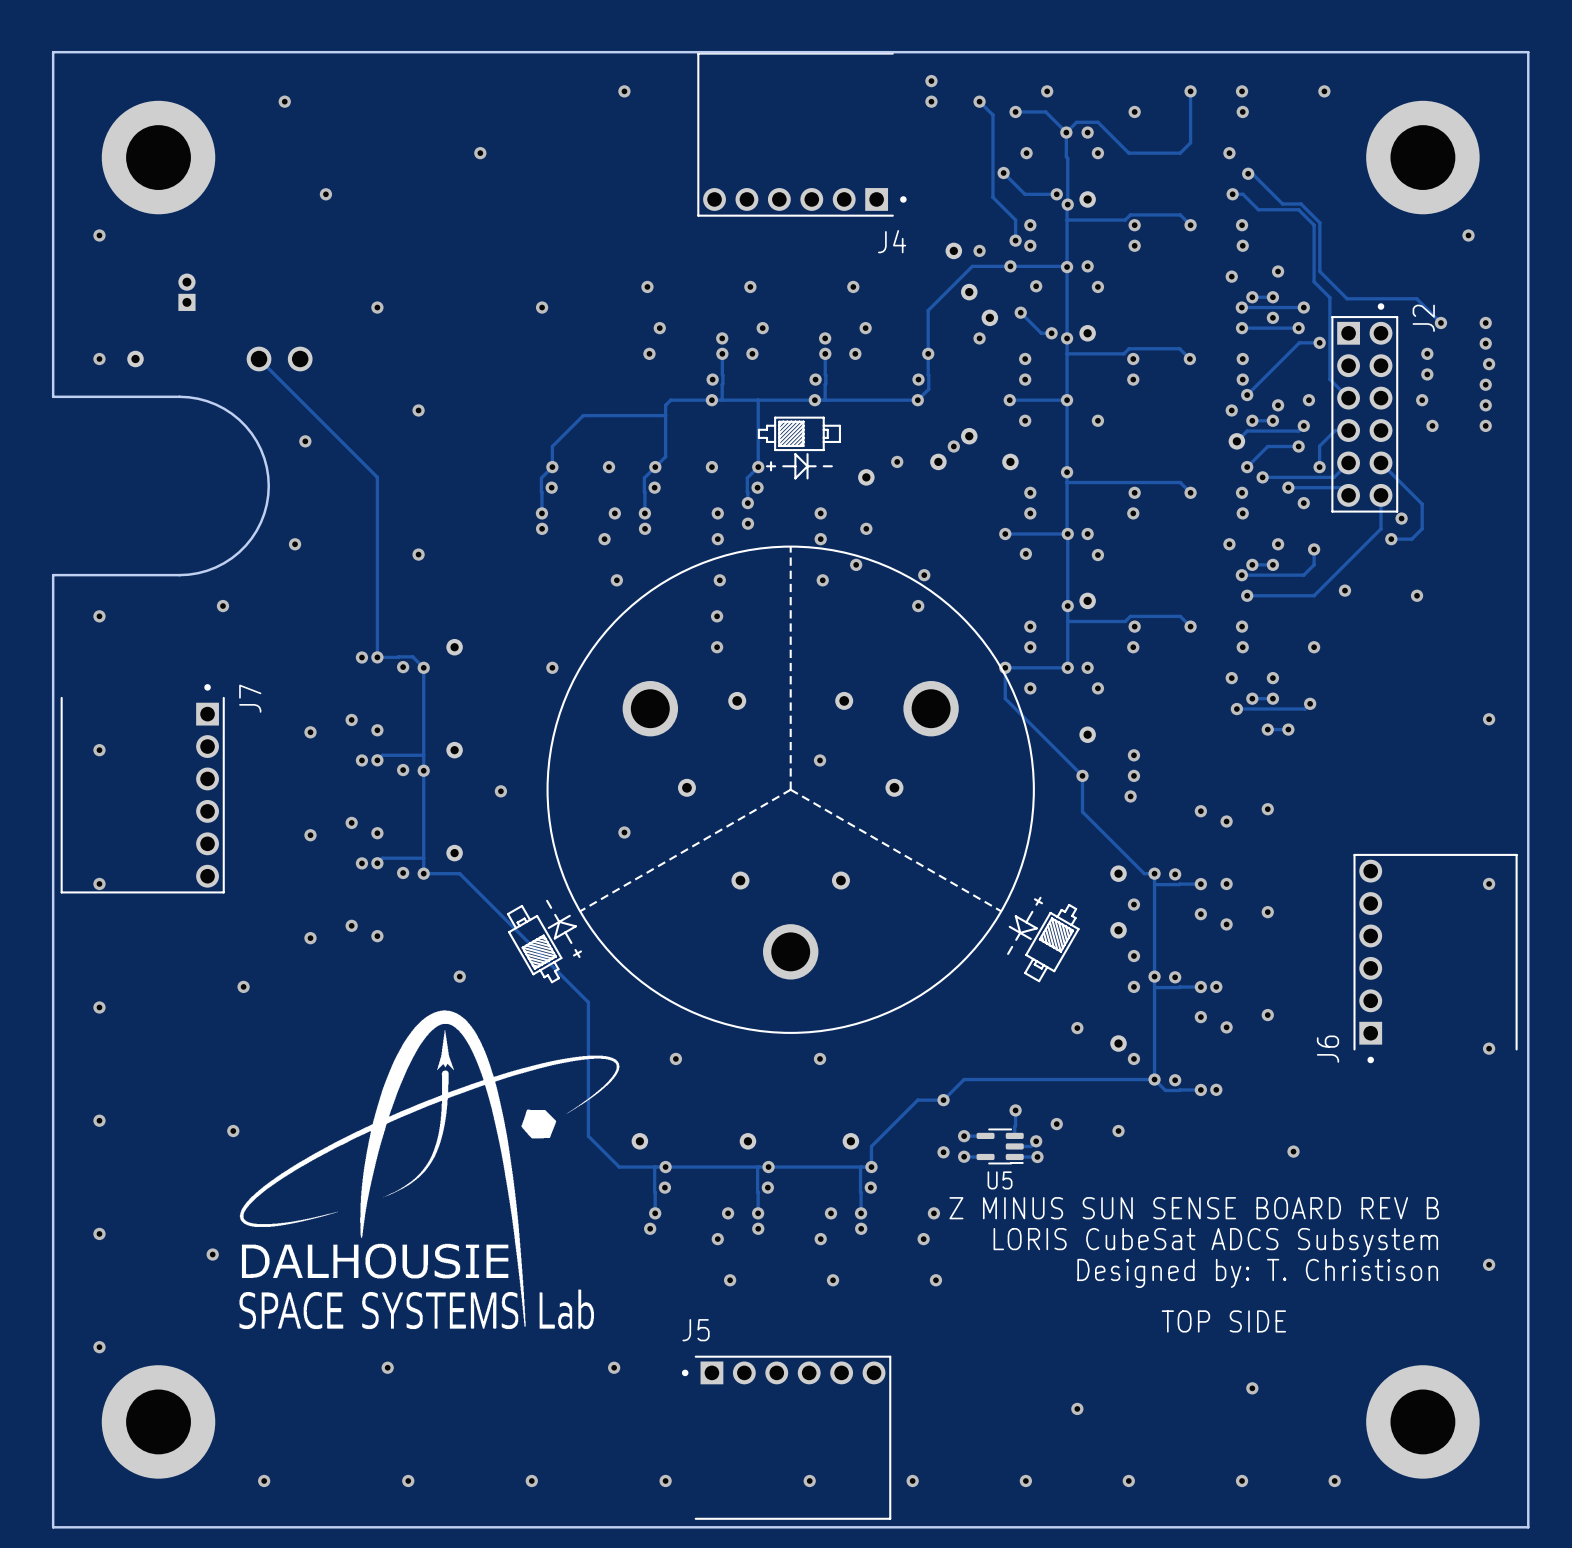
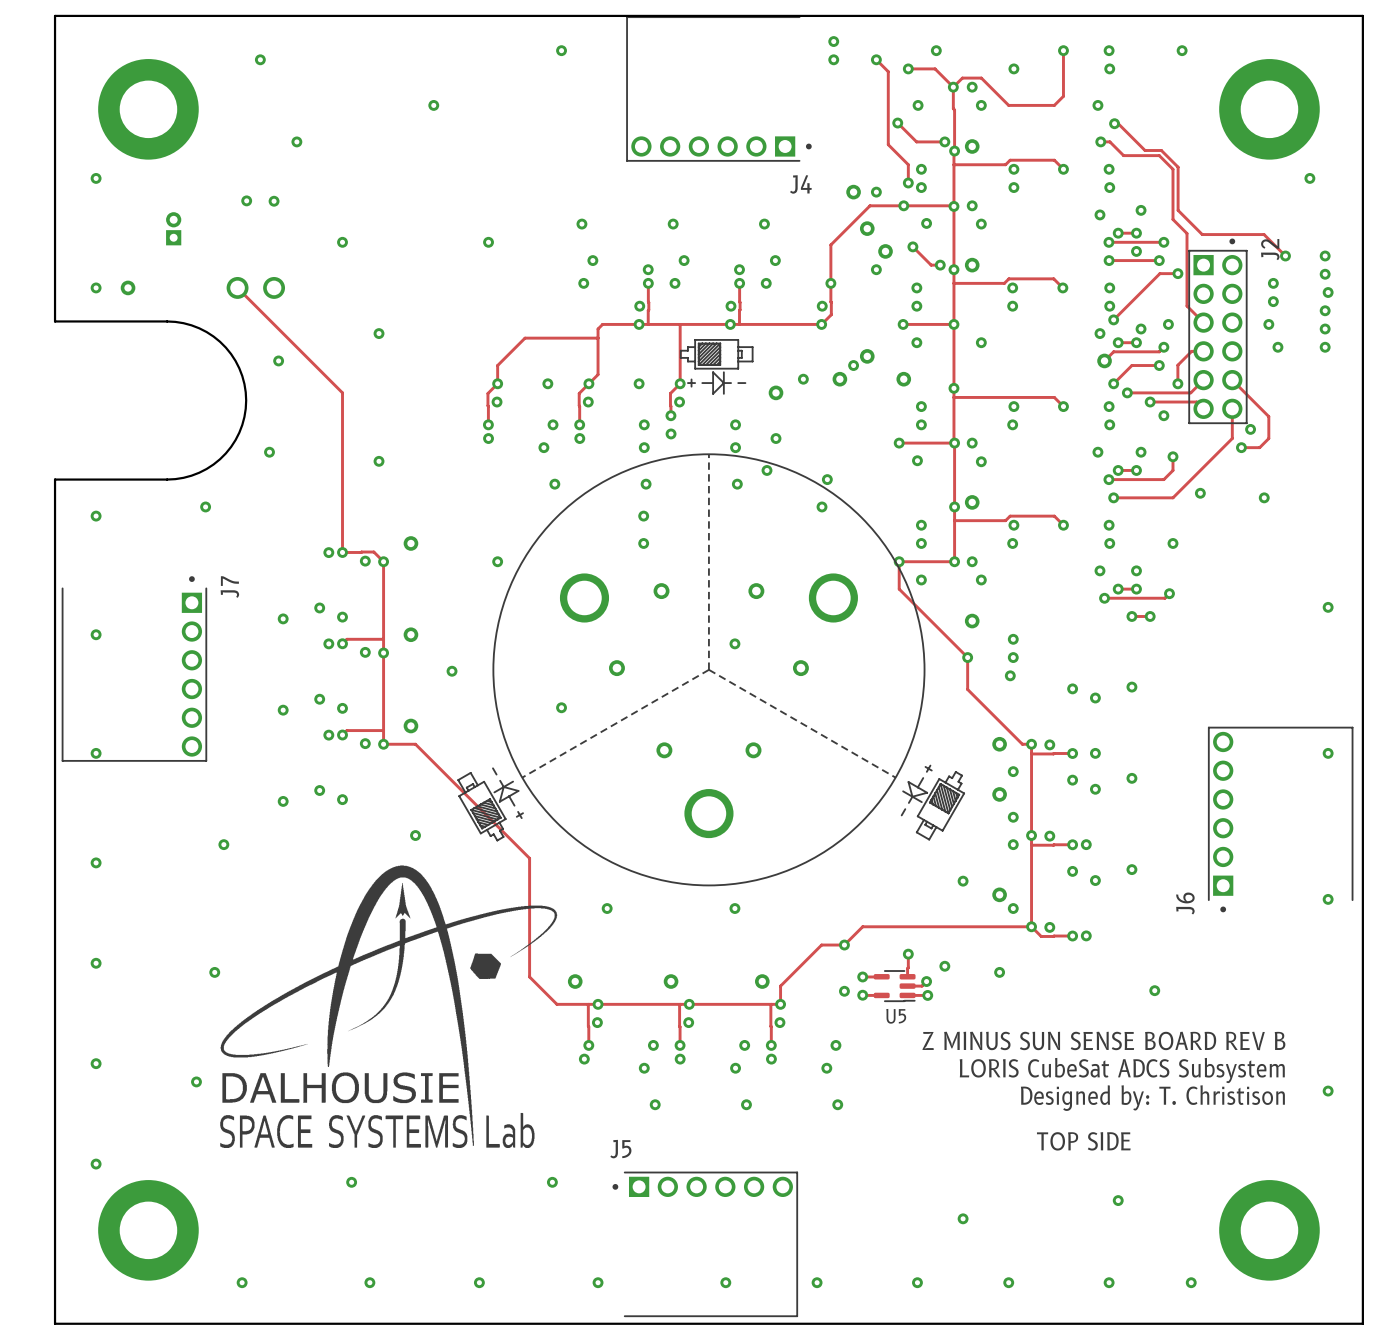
via: none -> (246, 200)
via: none -> (274, 201)

